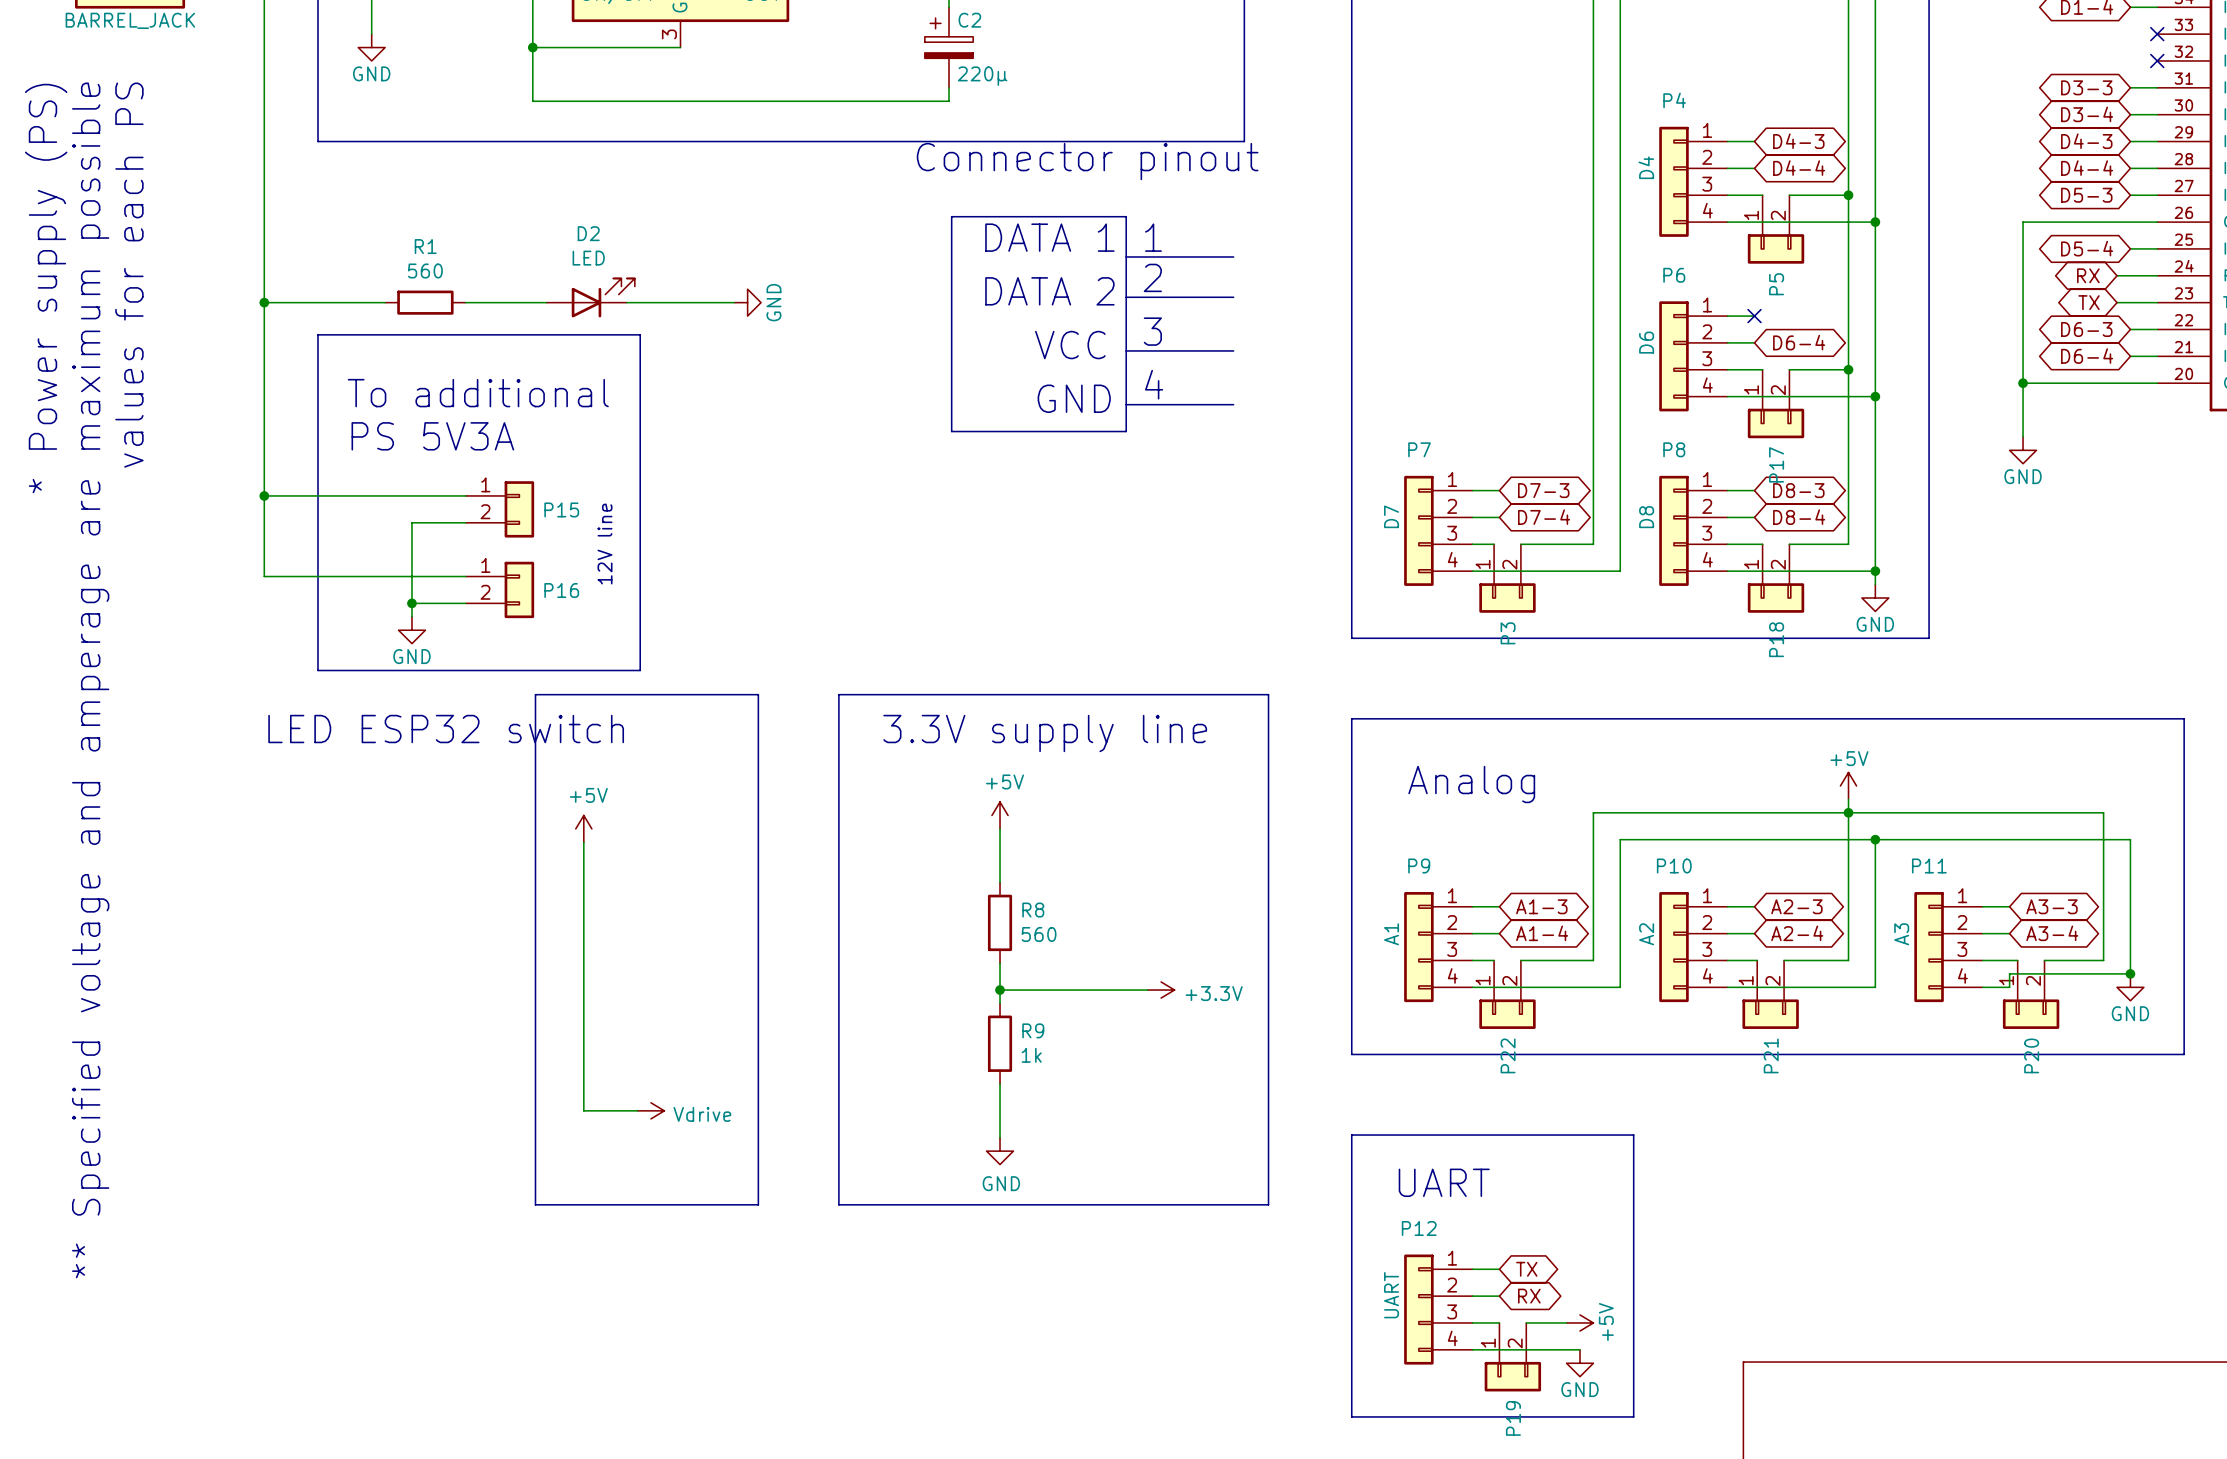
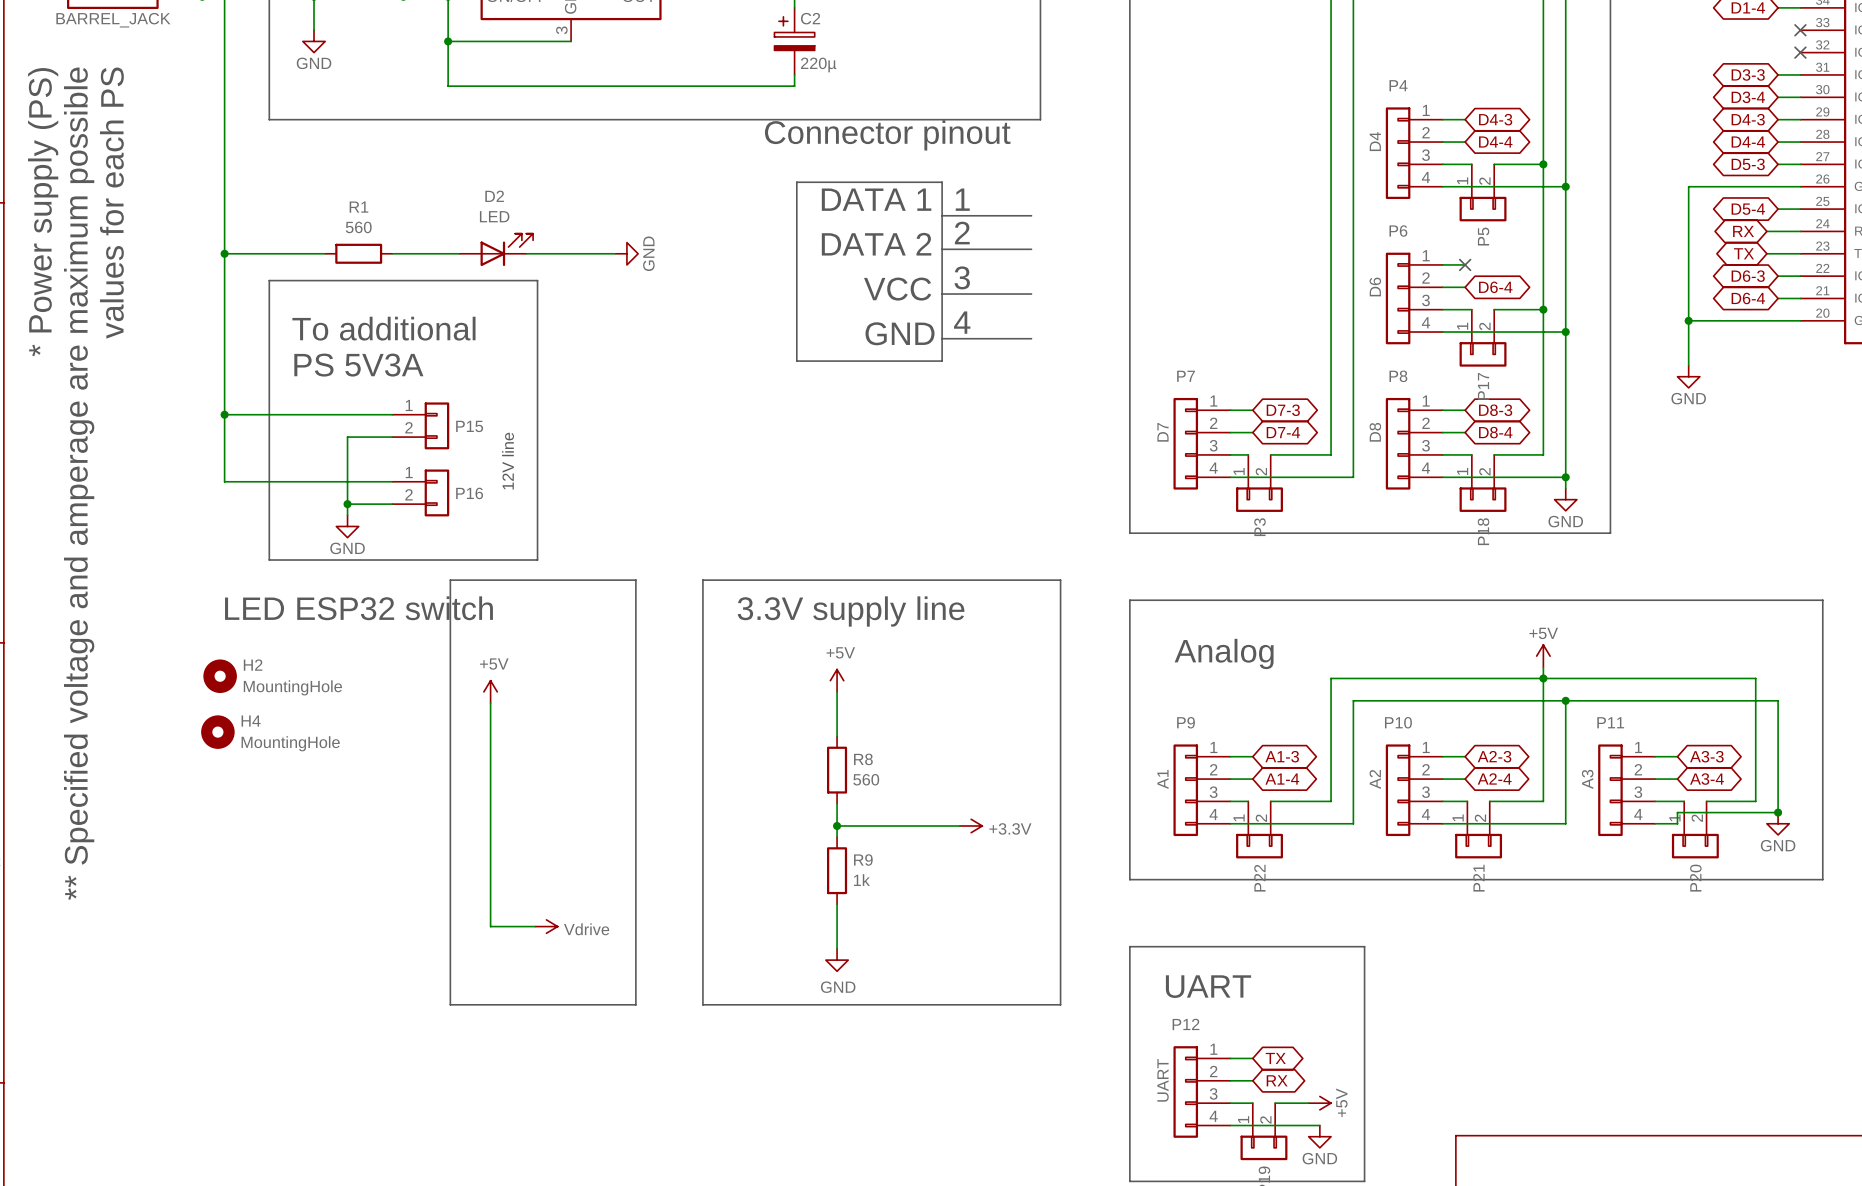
H2: none -> MountingHole (220, 676)
H4: none -> MountingHole (217, 732)

